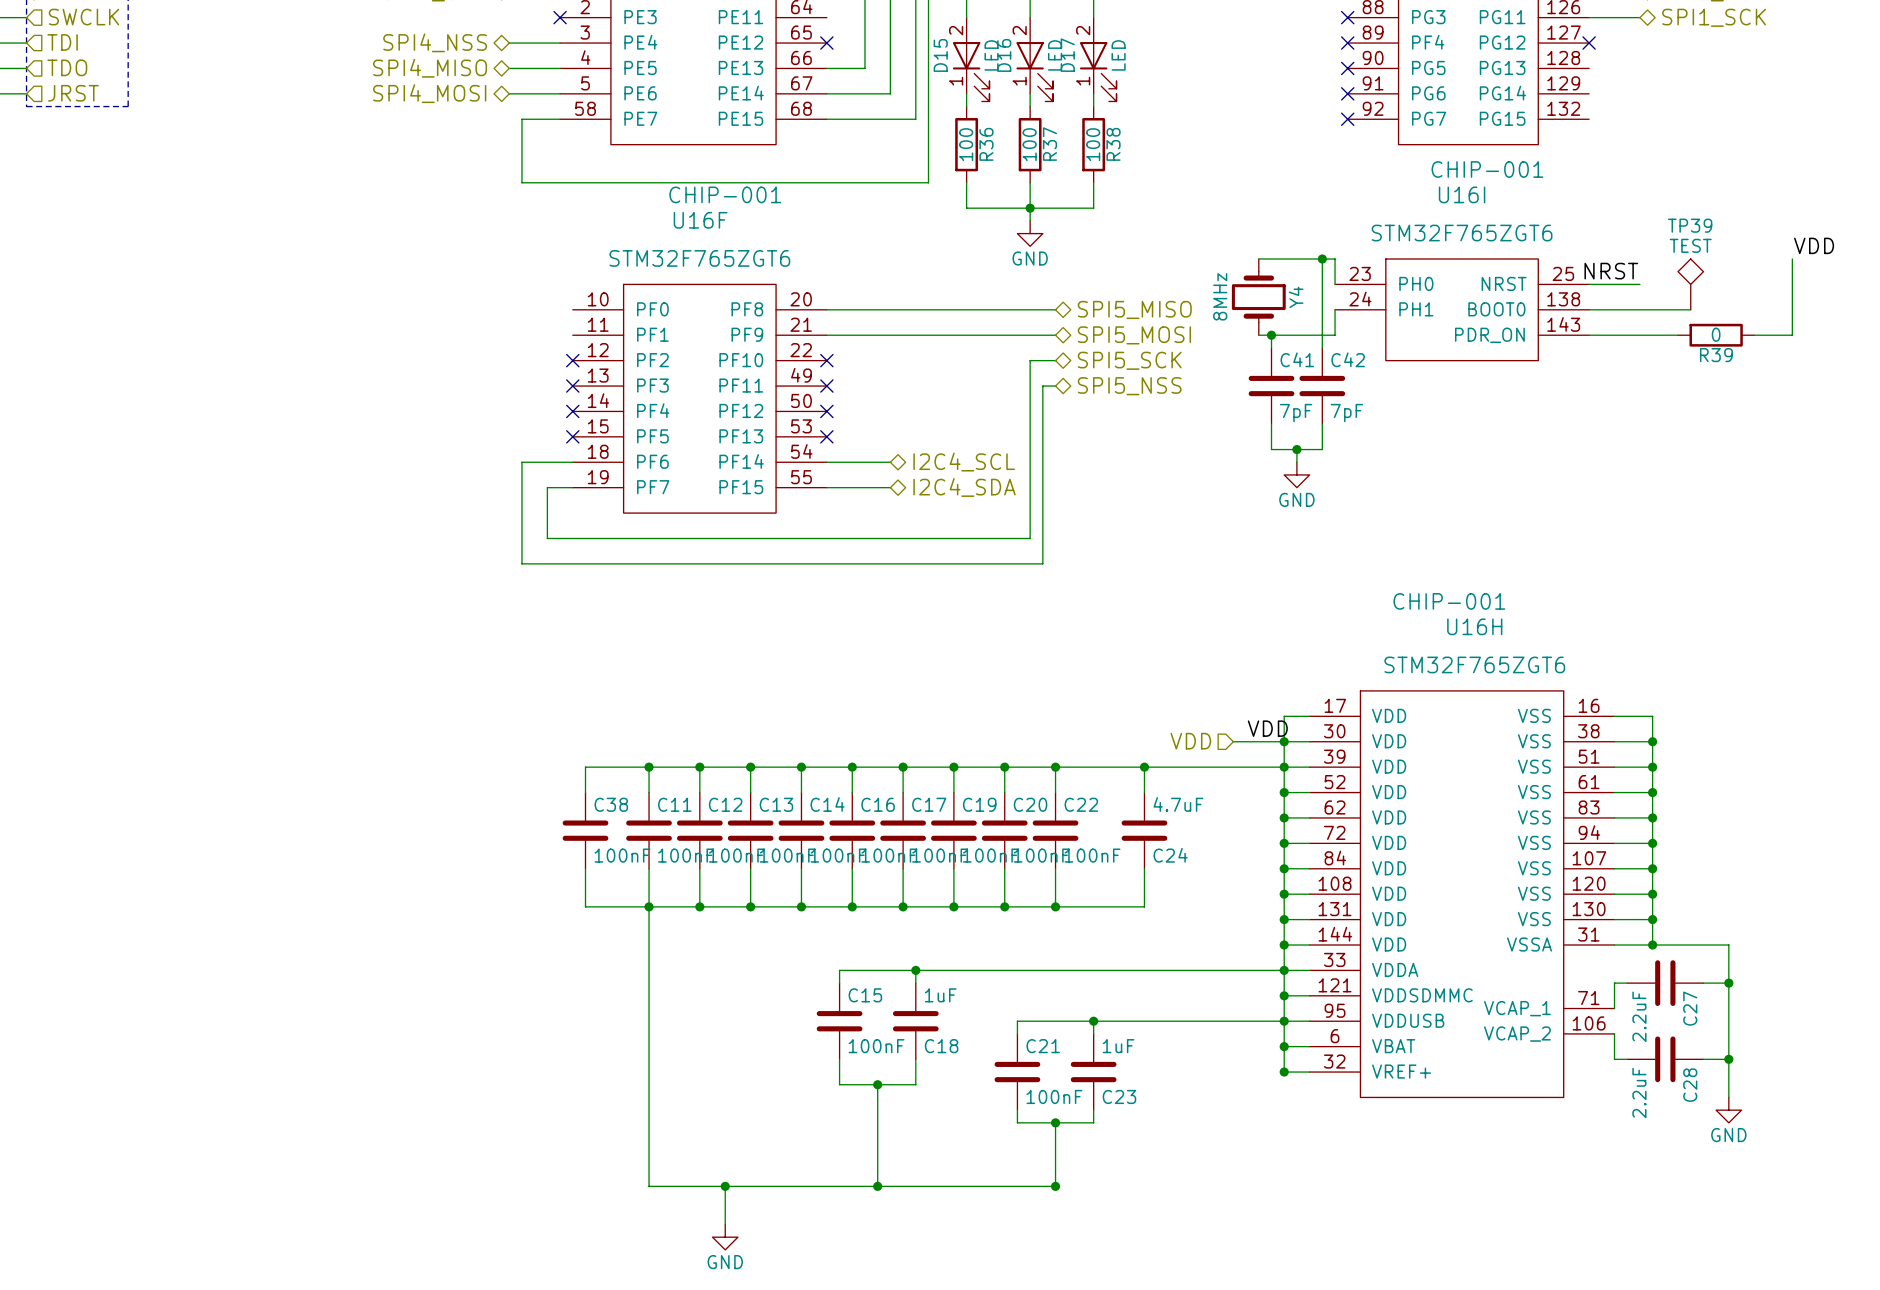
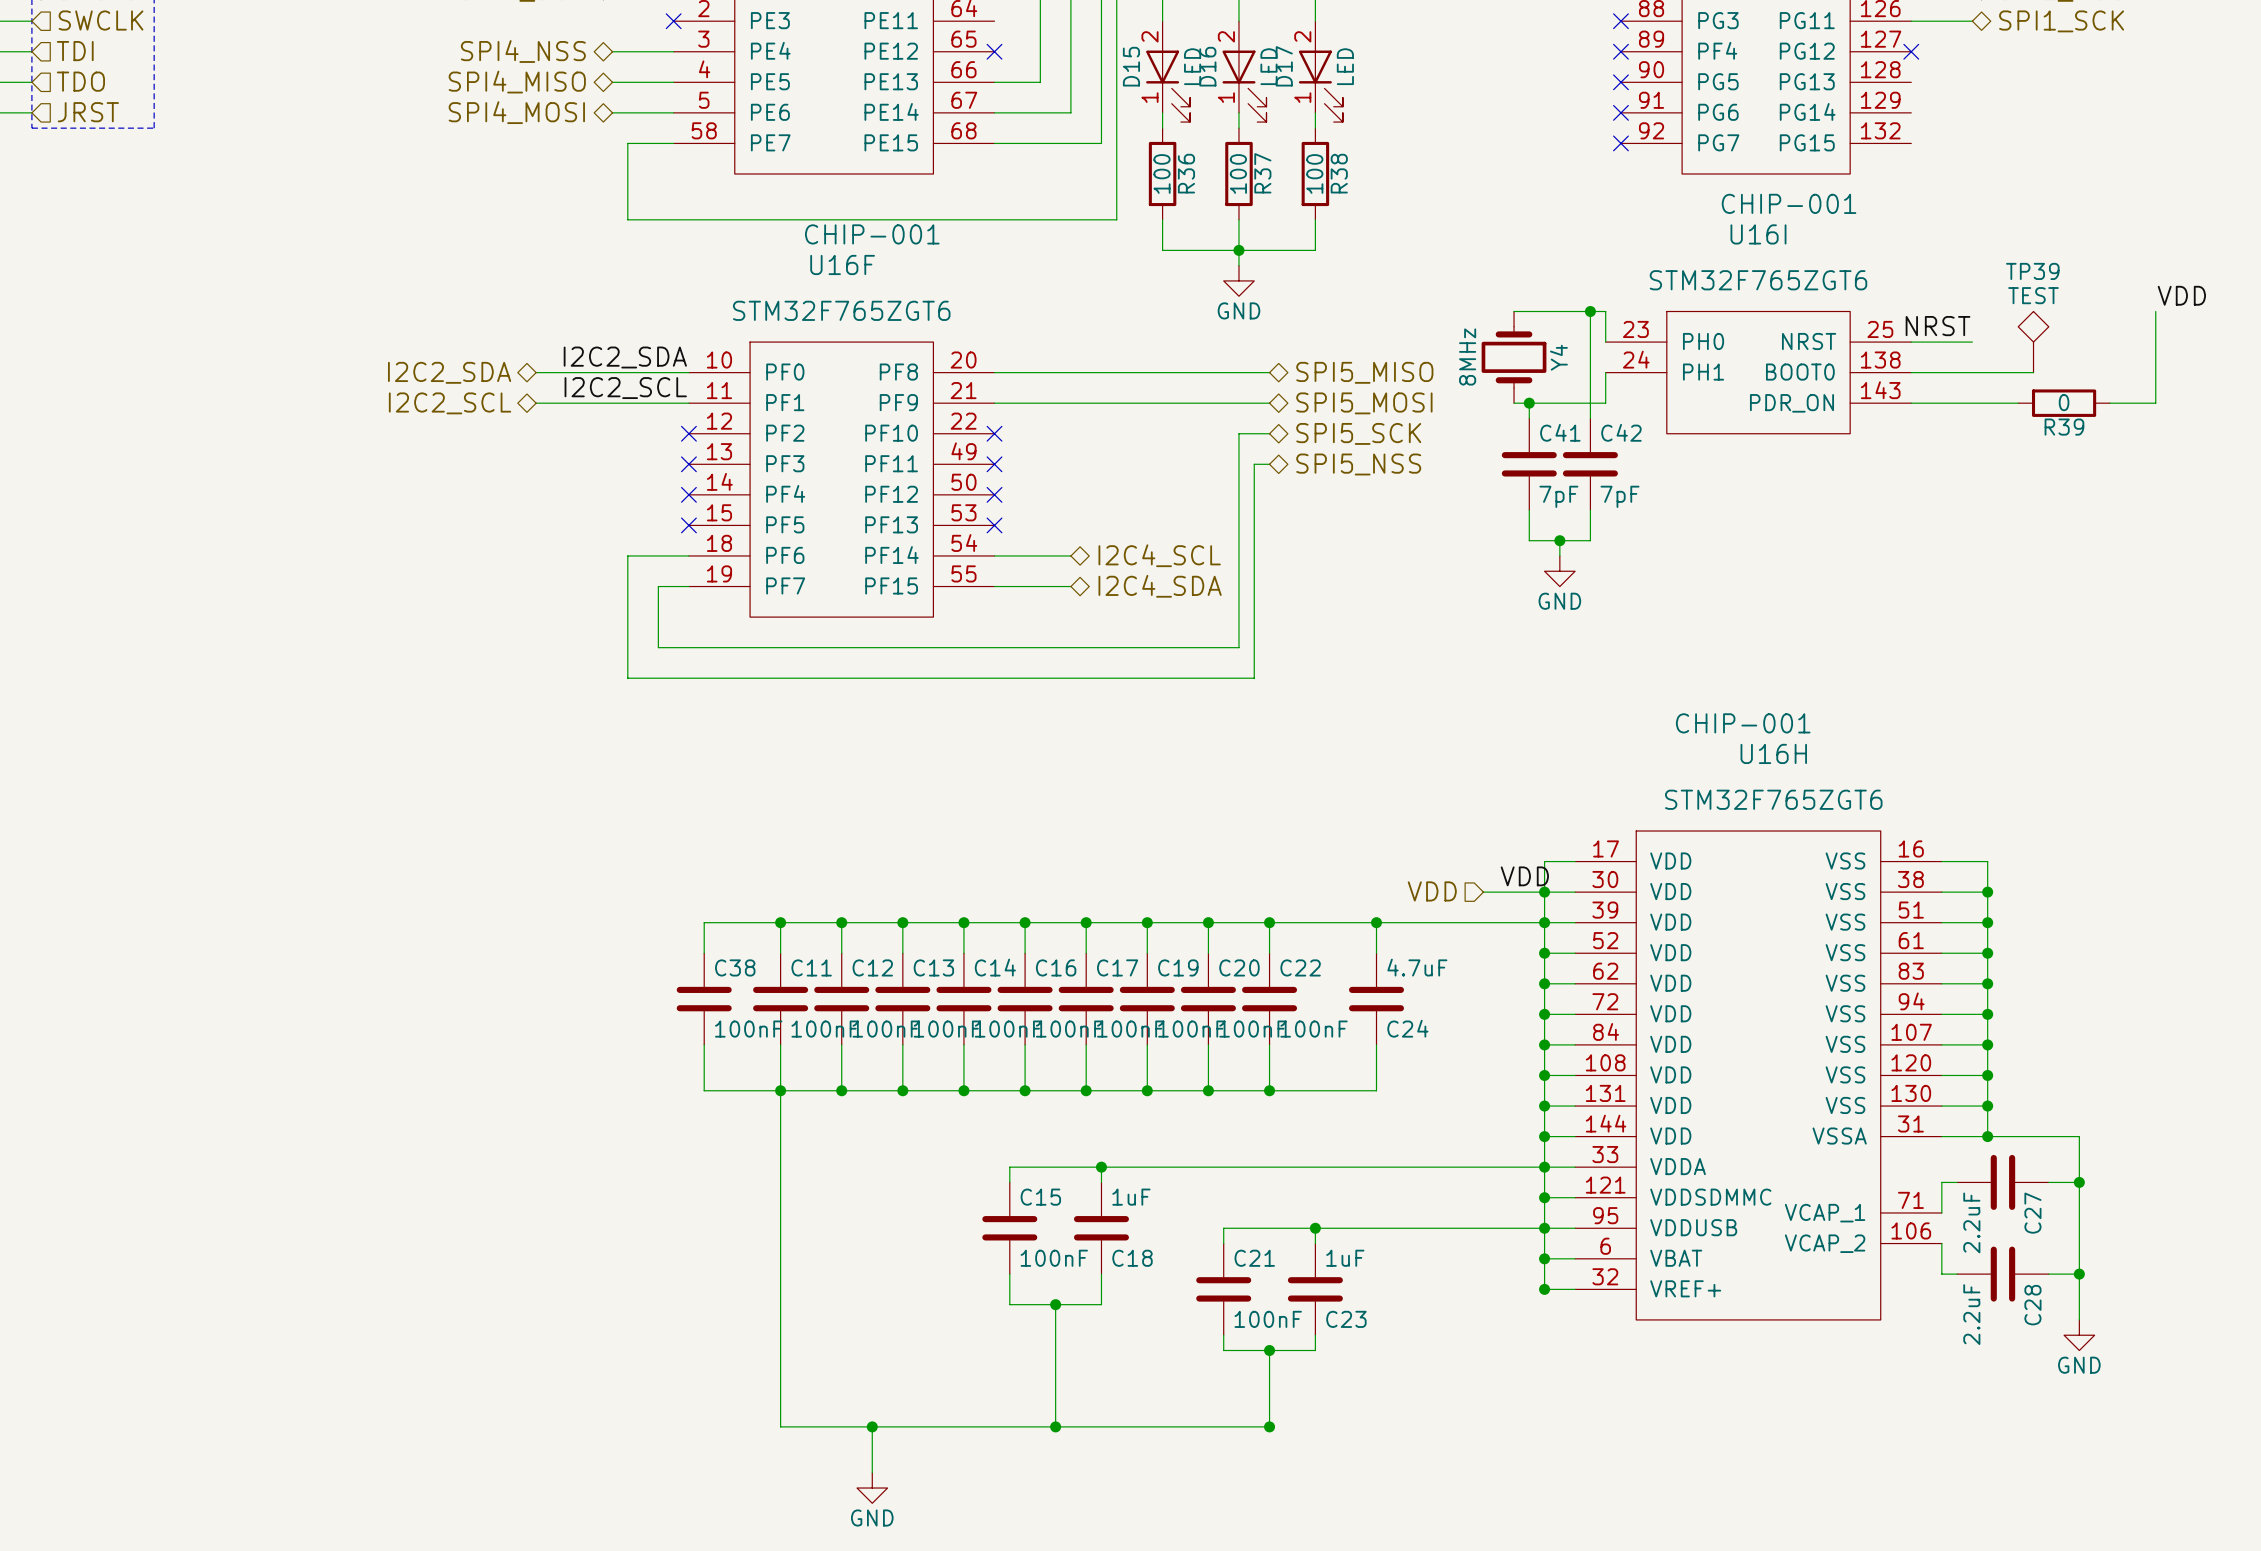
label: none -> I2C2_SDA (625, 357)
hierarchical label: none -> I2C2_SDA (449, 372)
wire: none -> (536, 372) (688, 372)
label: none -> I2C2_SCL (625, 388)
hierarchical label: none -> I2C2_SCL (450, 403)
wire: none -> (536, 403) (688, 403)

